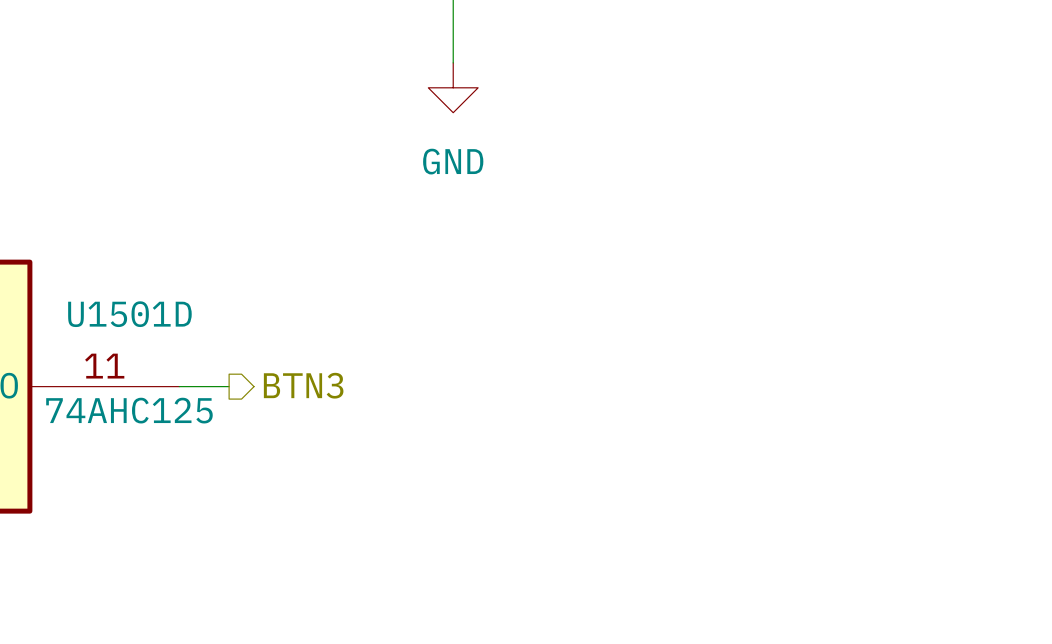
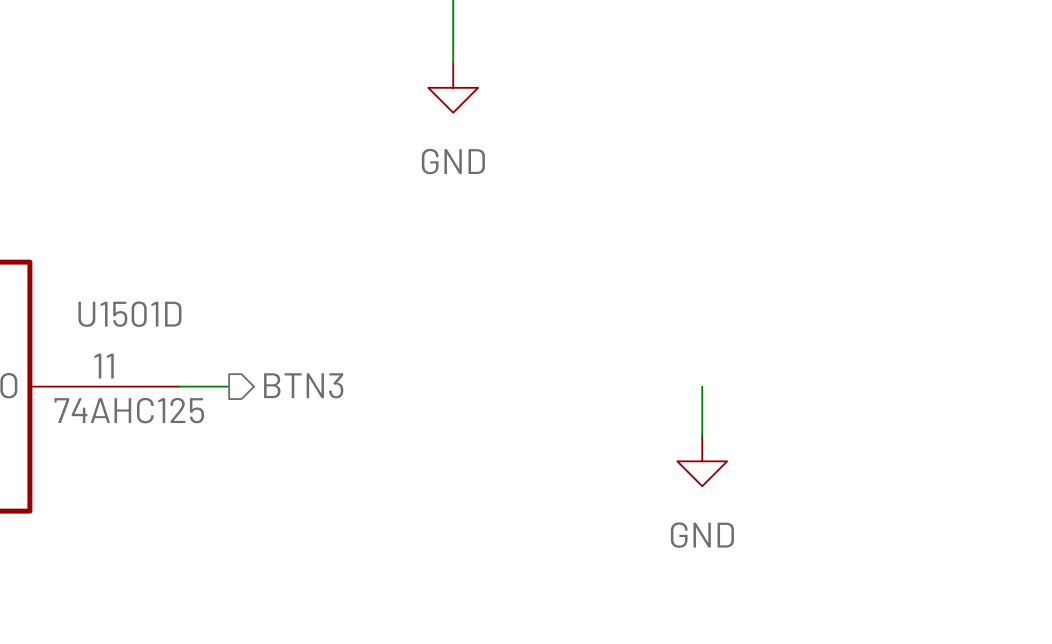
wire: none -> (702, 386) (702, 436)
power symbol: none -> GND (702, 461)

